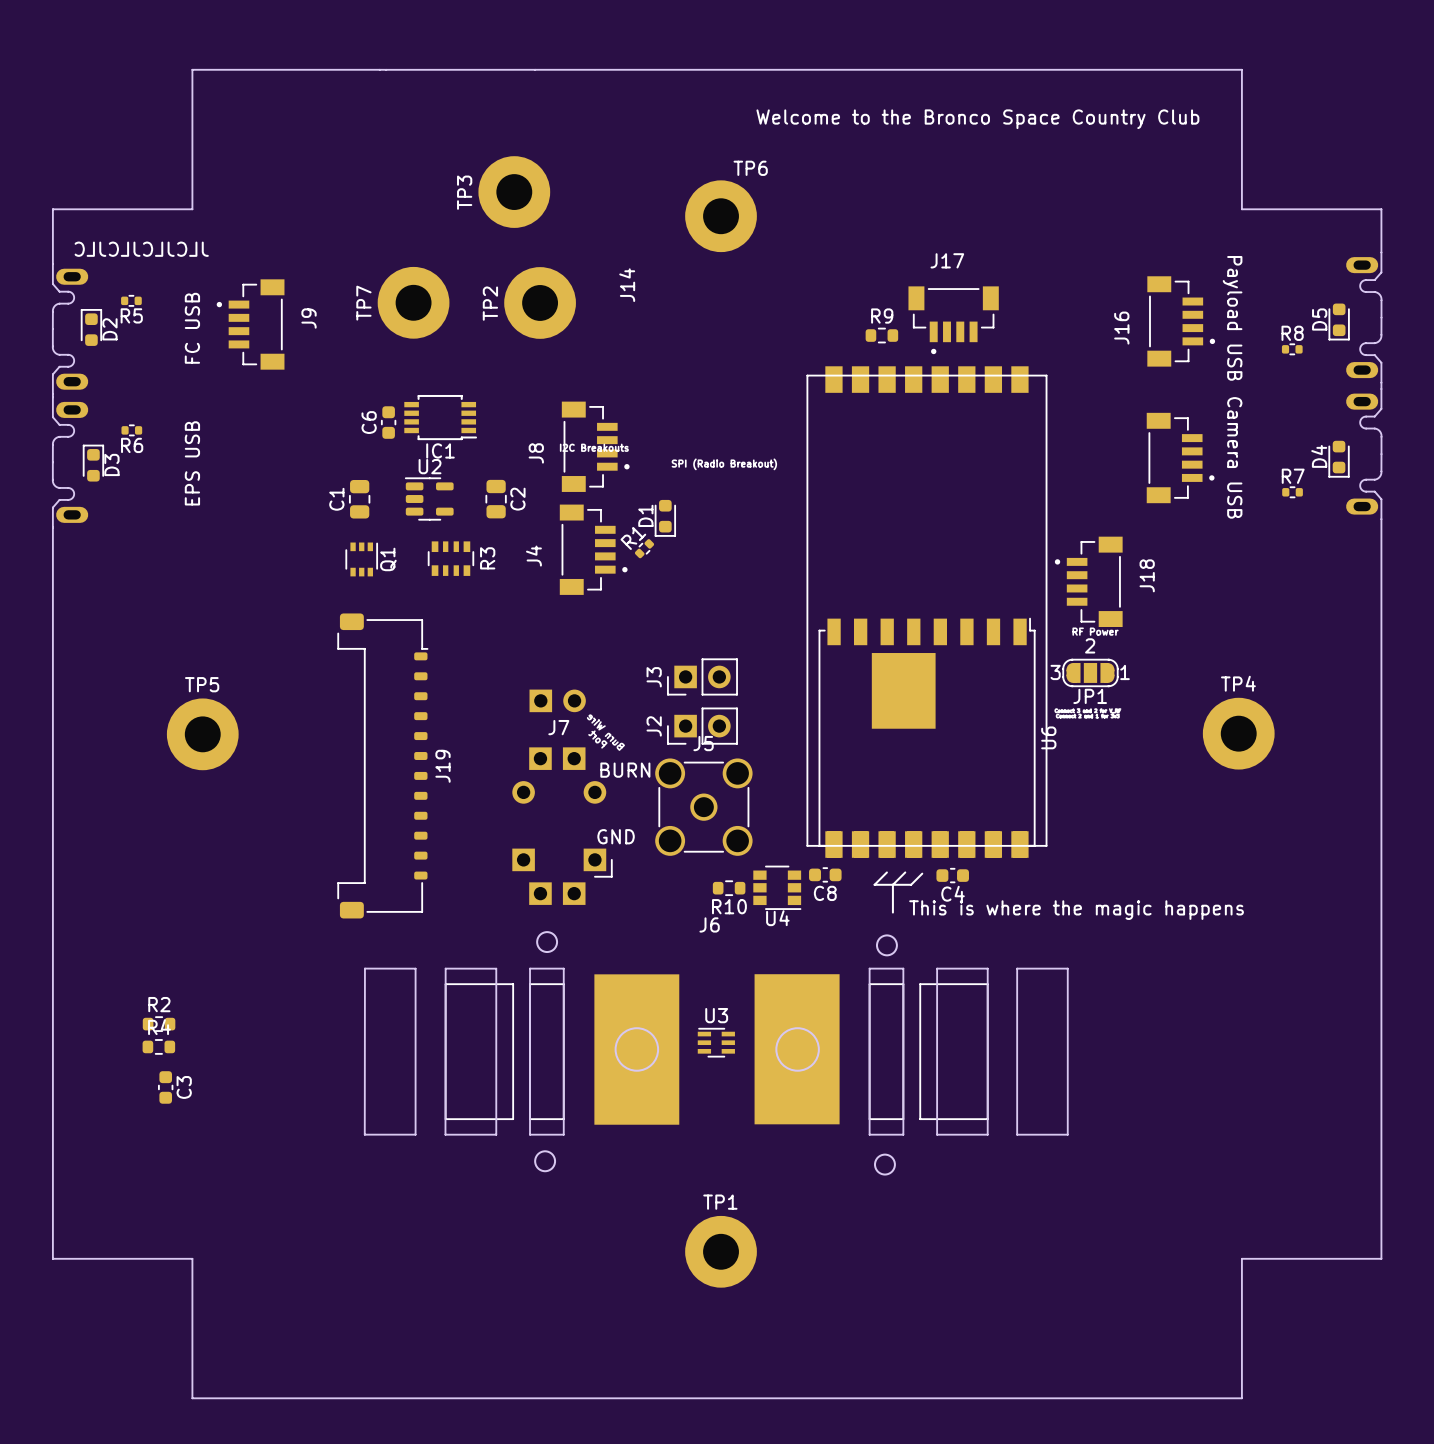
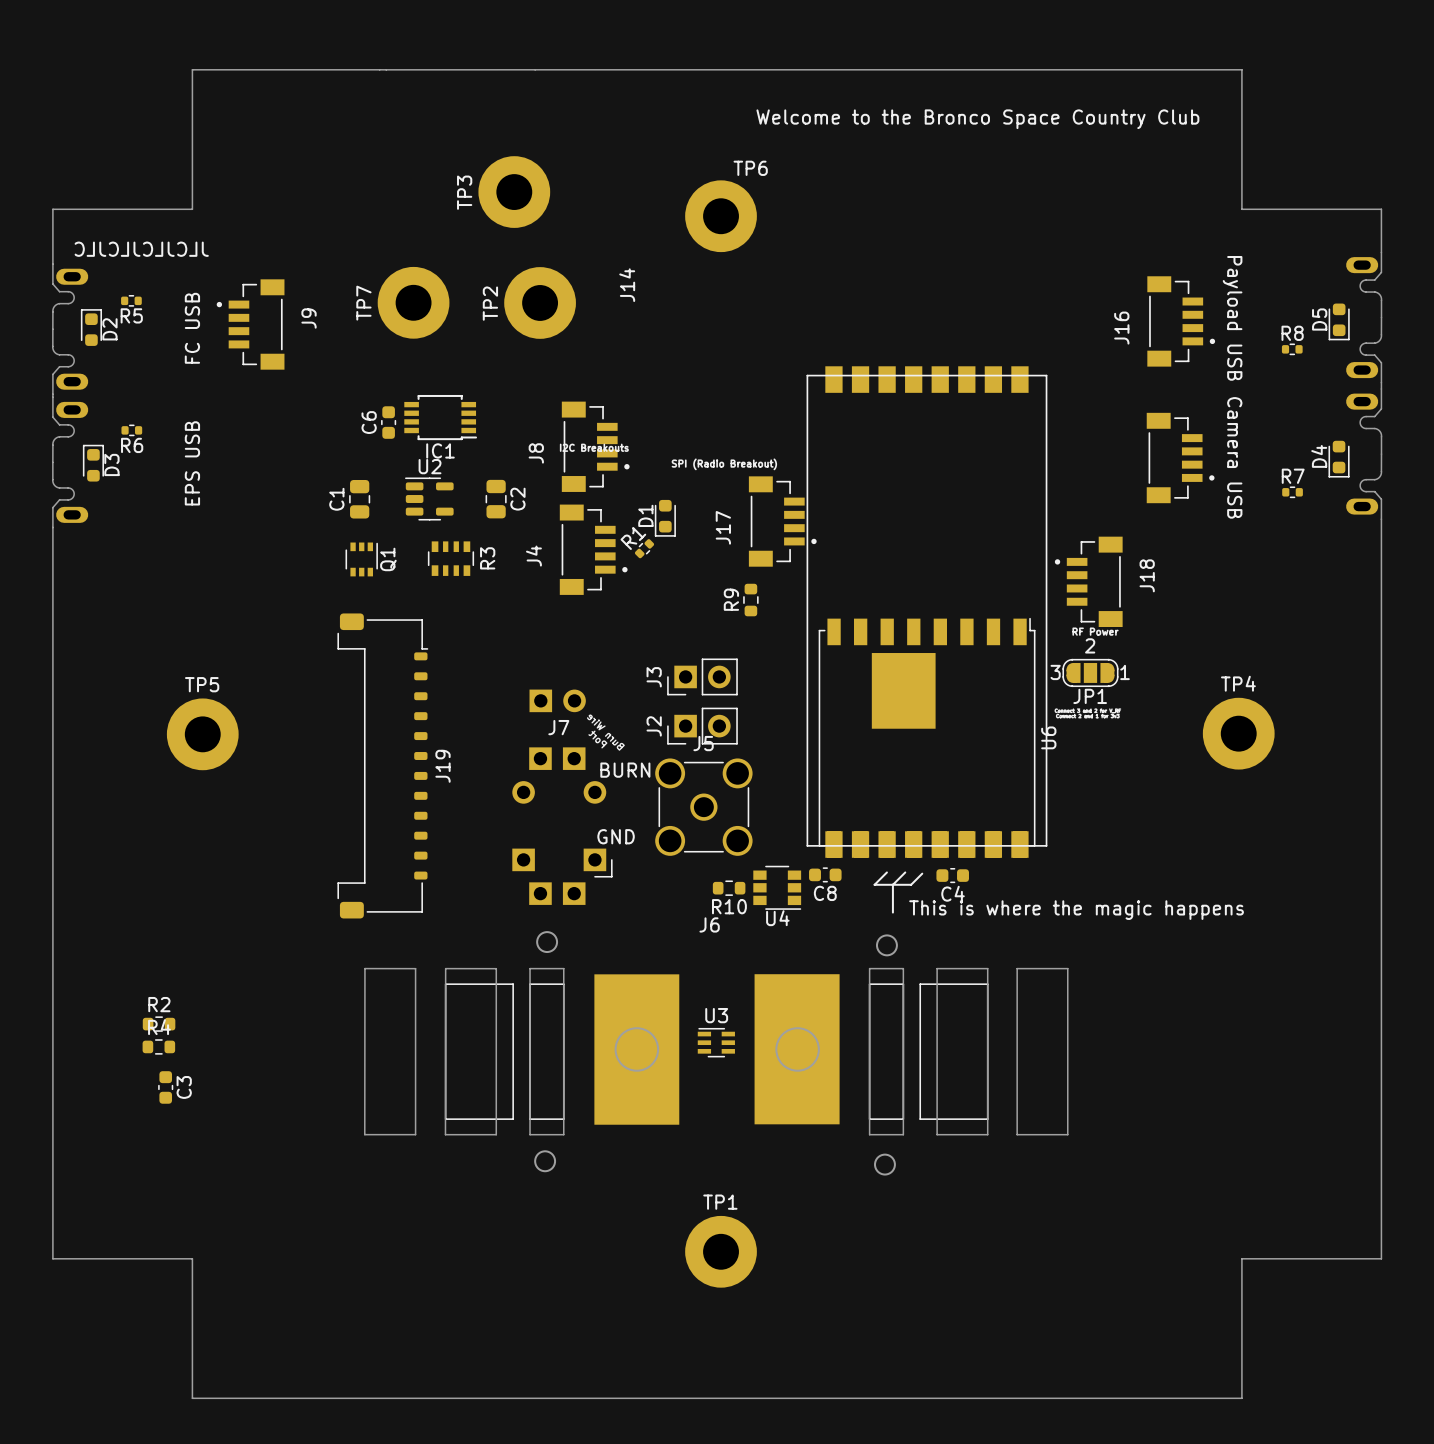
R9 name position: R9 (882, 316) -> R9 (731, 599)
J17 rotation: 0° (953, 320) -> 90° counterclockwise (782, 521)
J17 position: (953, 320) -> (782, 521)
R9 rotation: 0° (881, 335) -> 90° clockwise (750, 600)
R9 position: (881, 335) -> (750, 600)

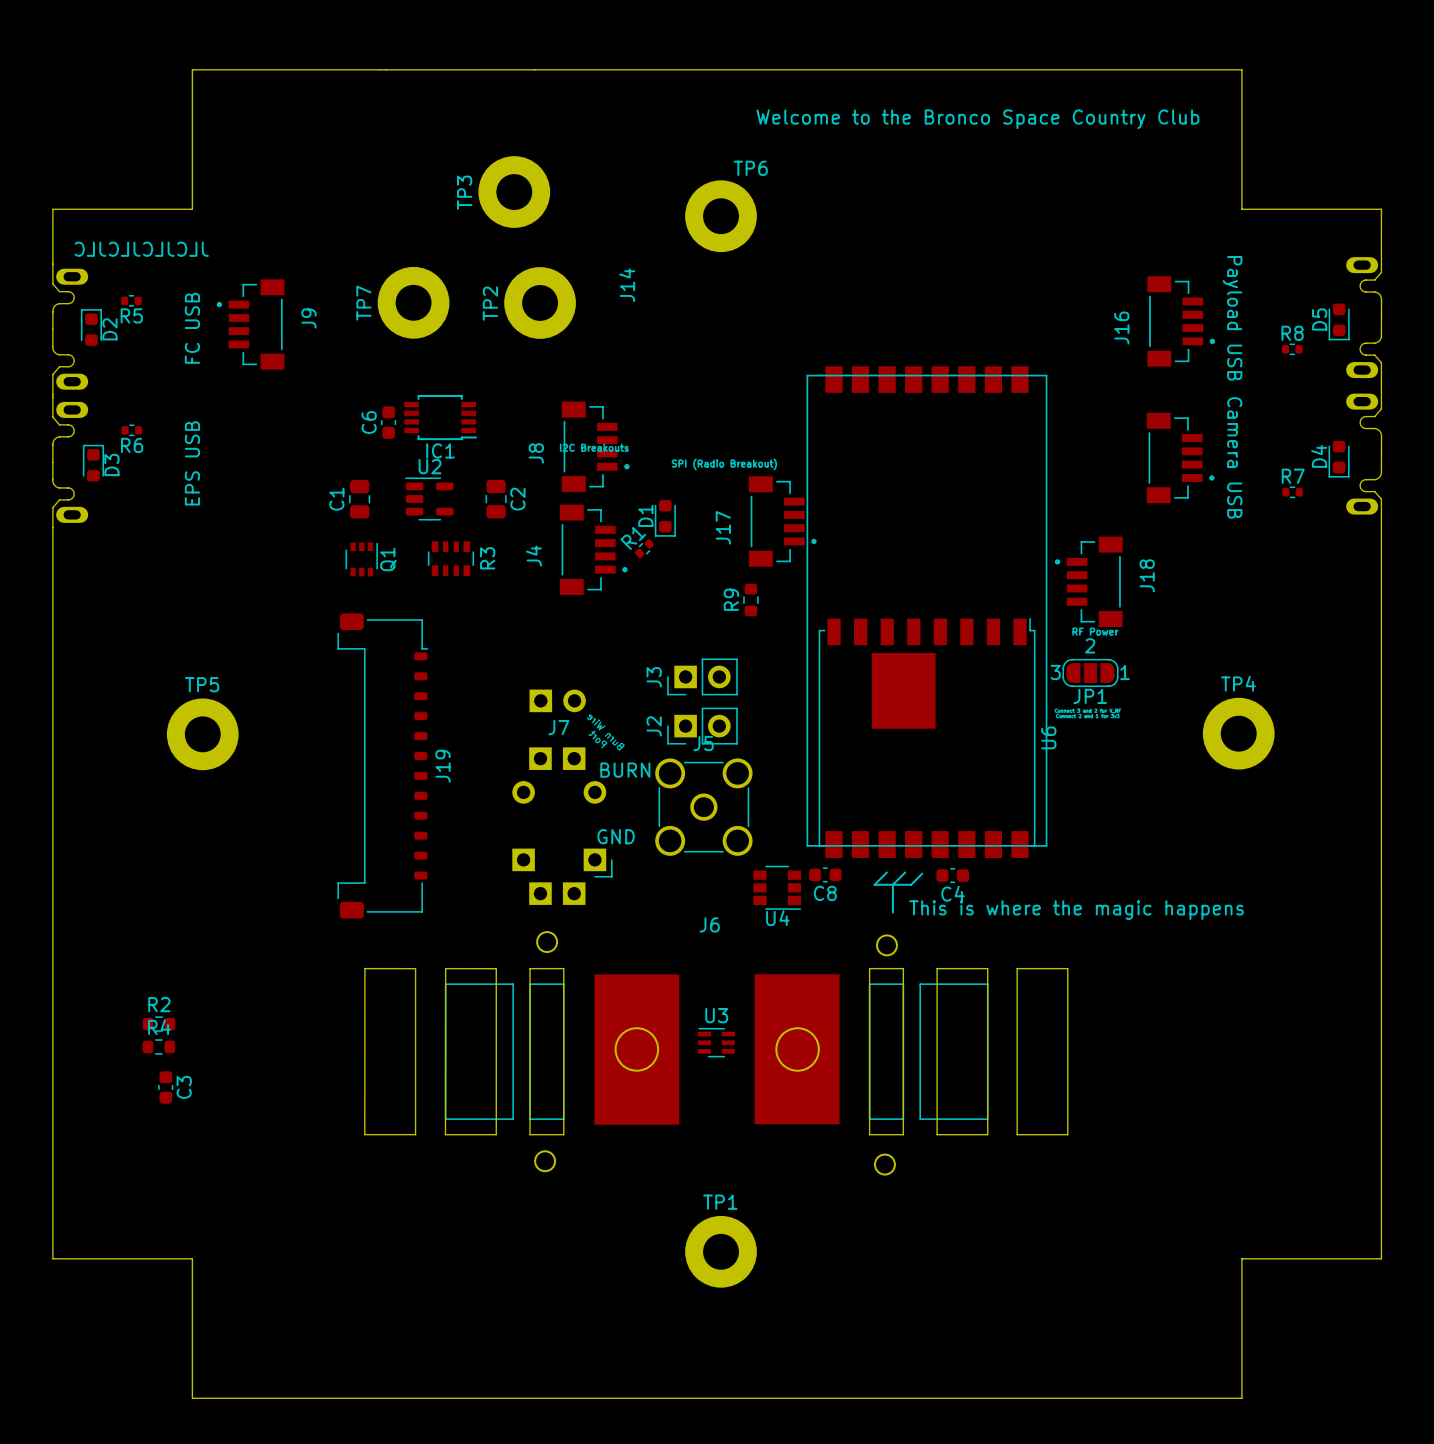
R10: (729, 888) -> none

